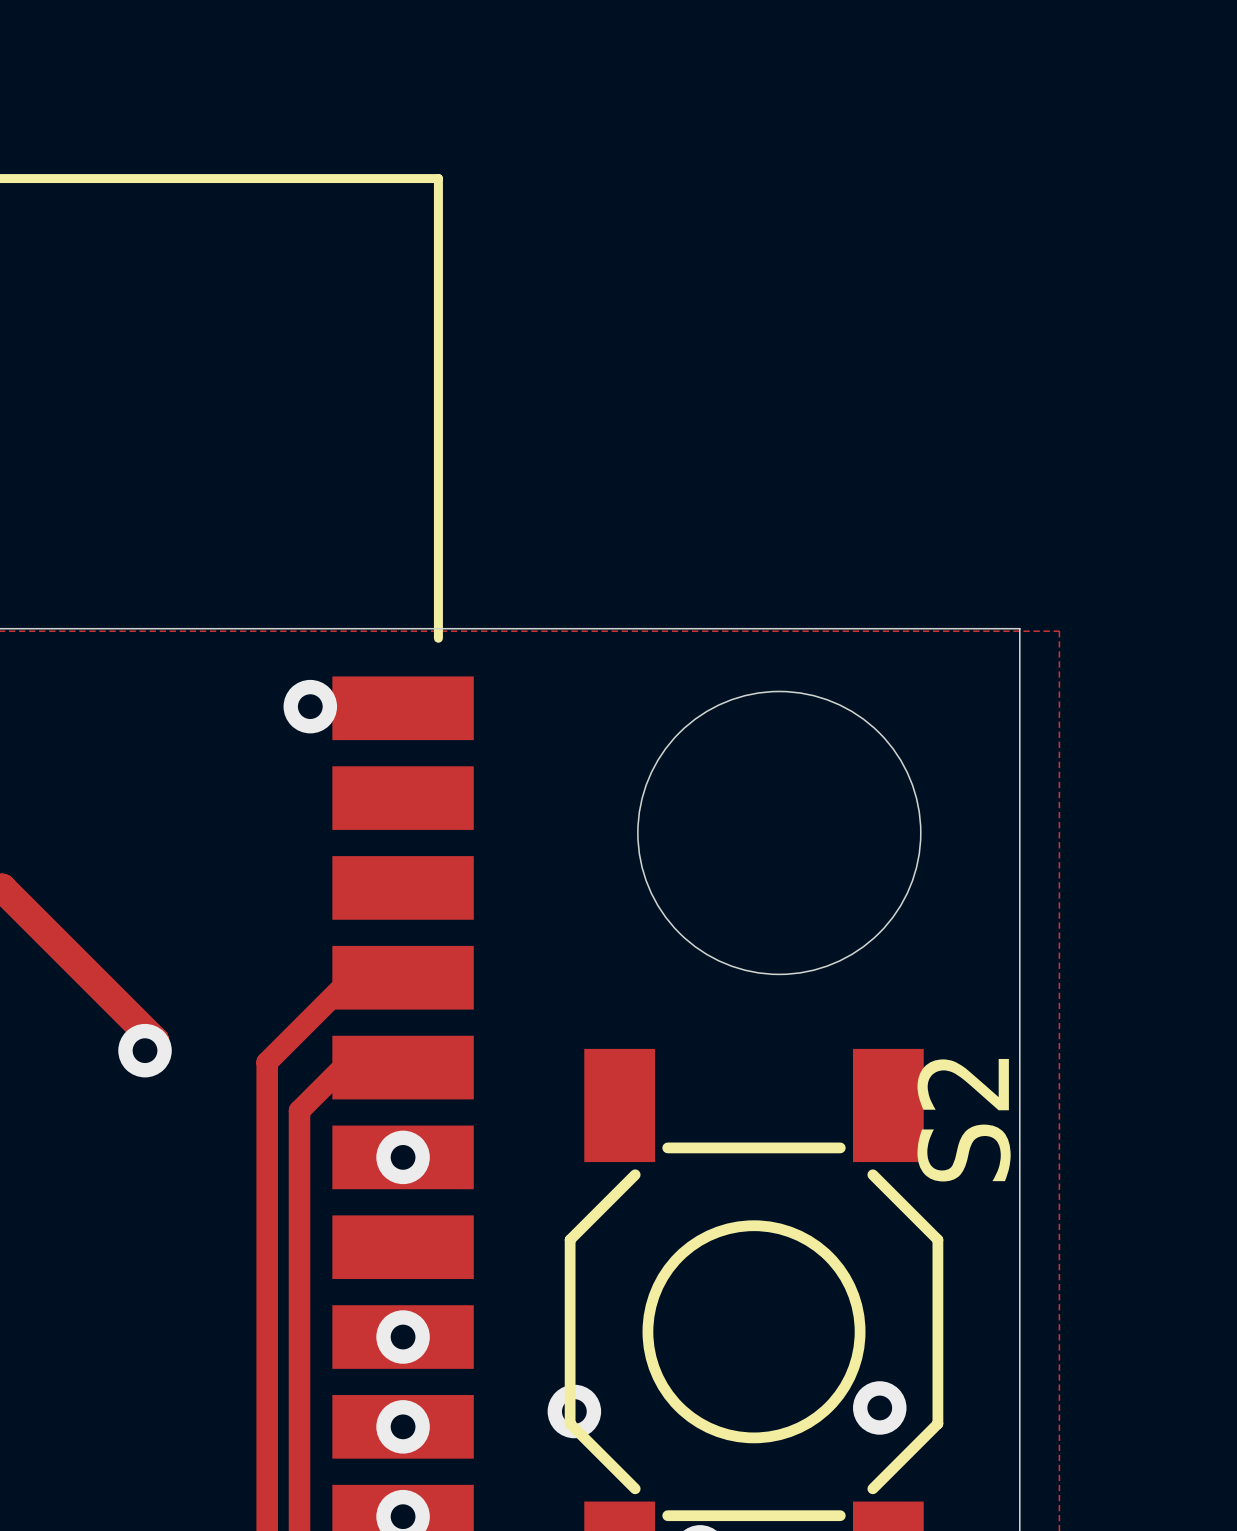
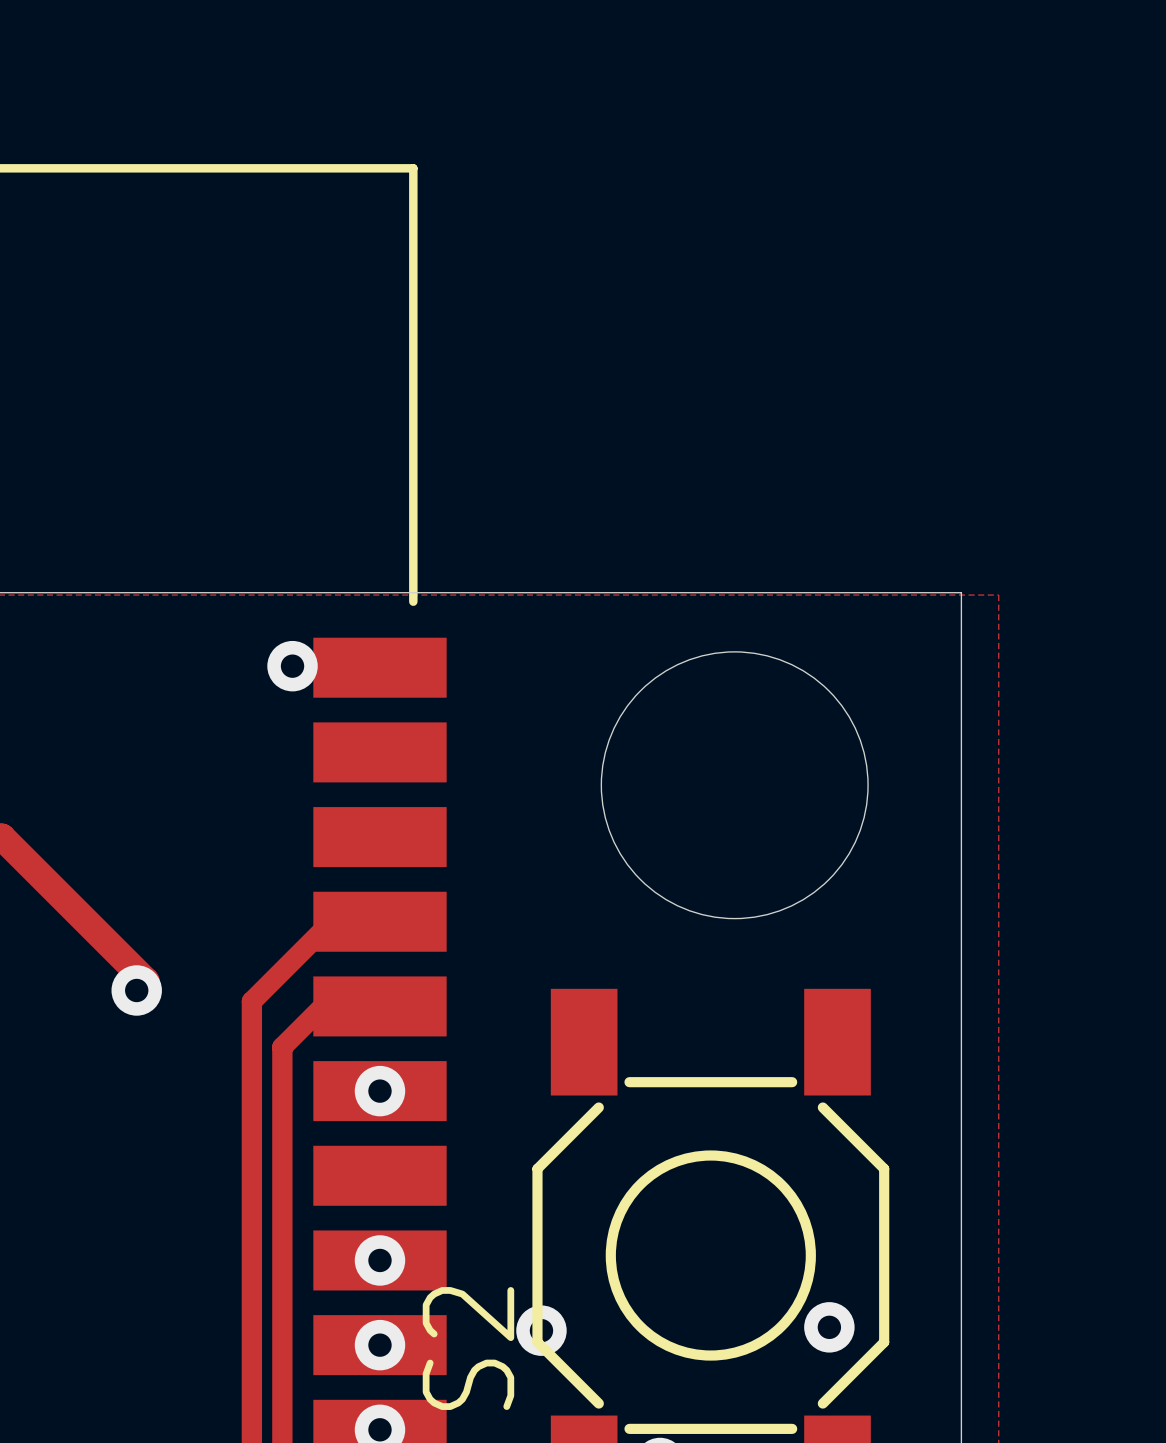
S2 name position: S2 (964, 1120) -> S2 (468, 1348)

